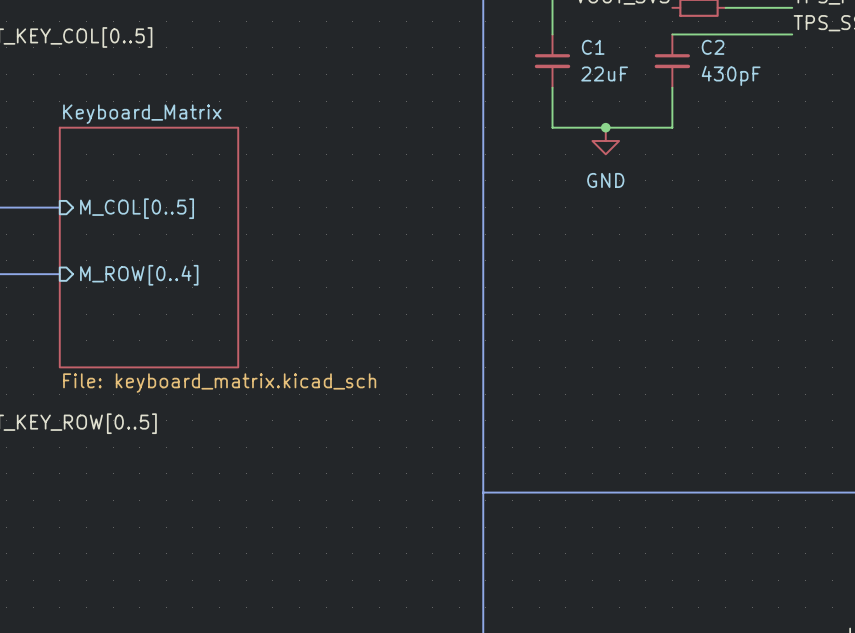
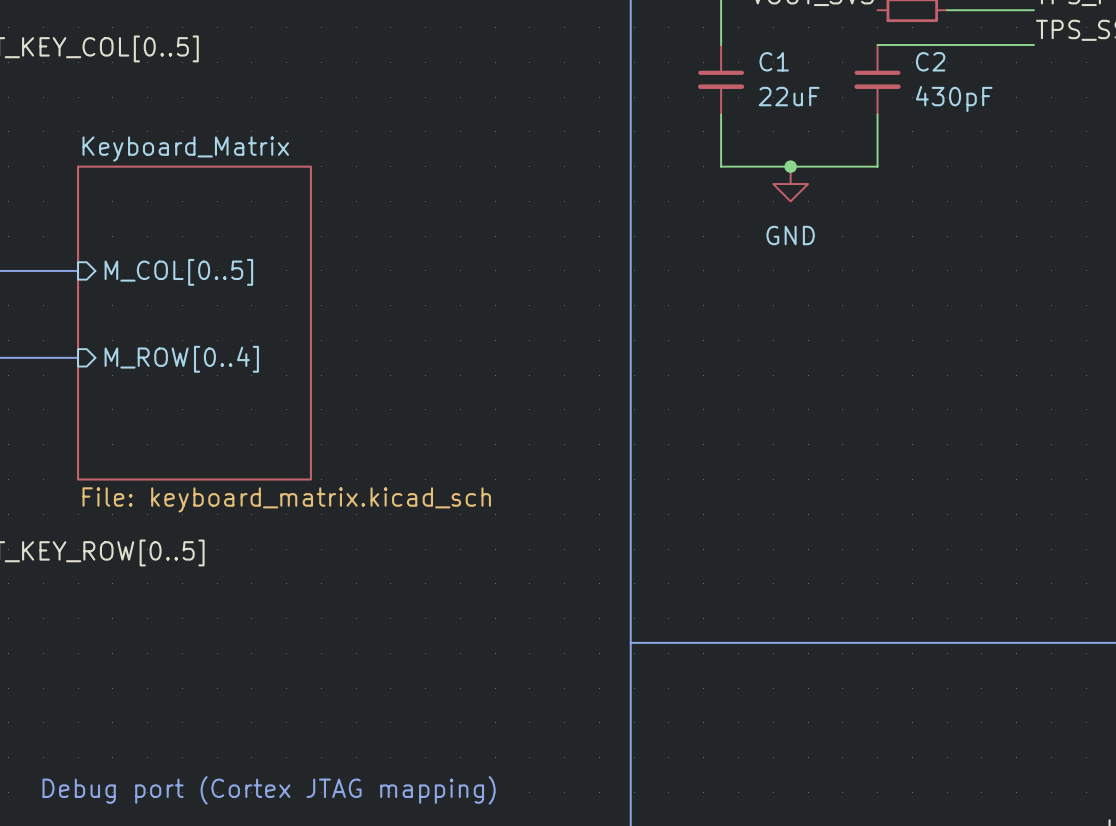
text: none -> Debug port (Cortex JTAG mapping) (269, 790)

